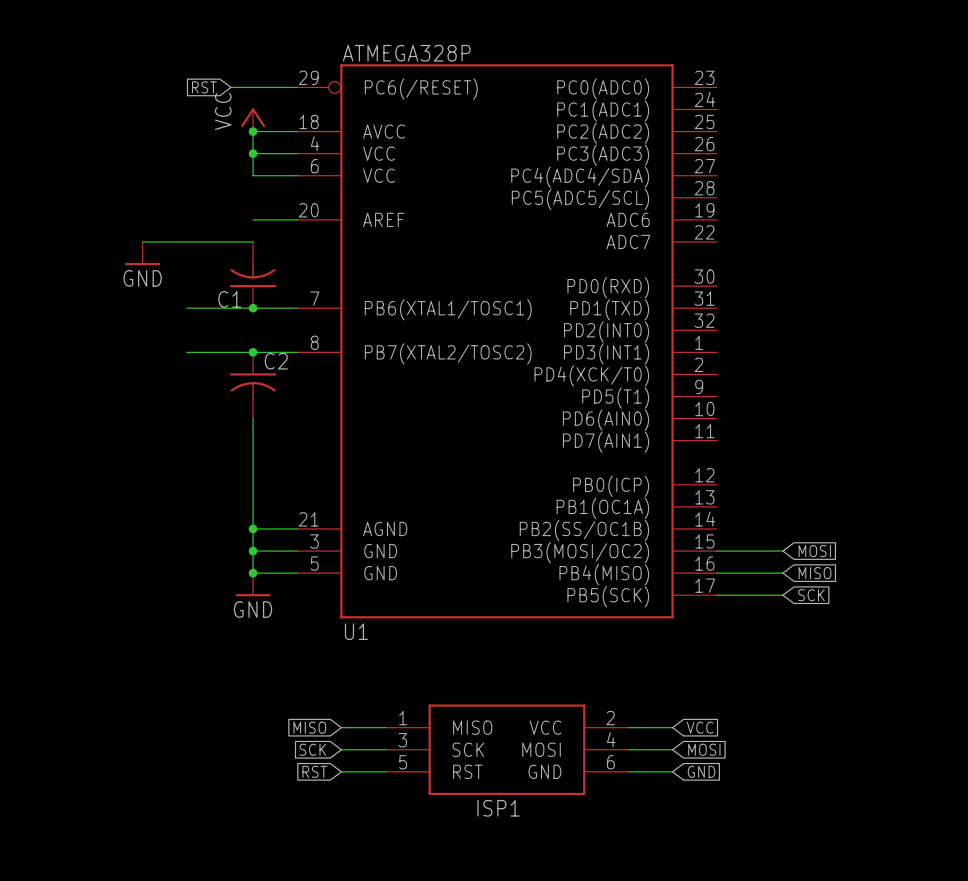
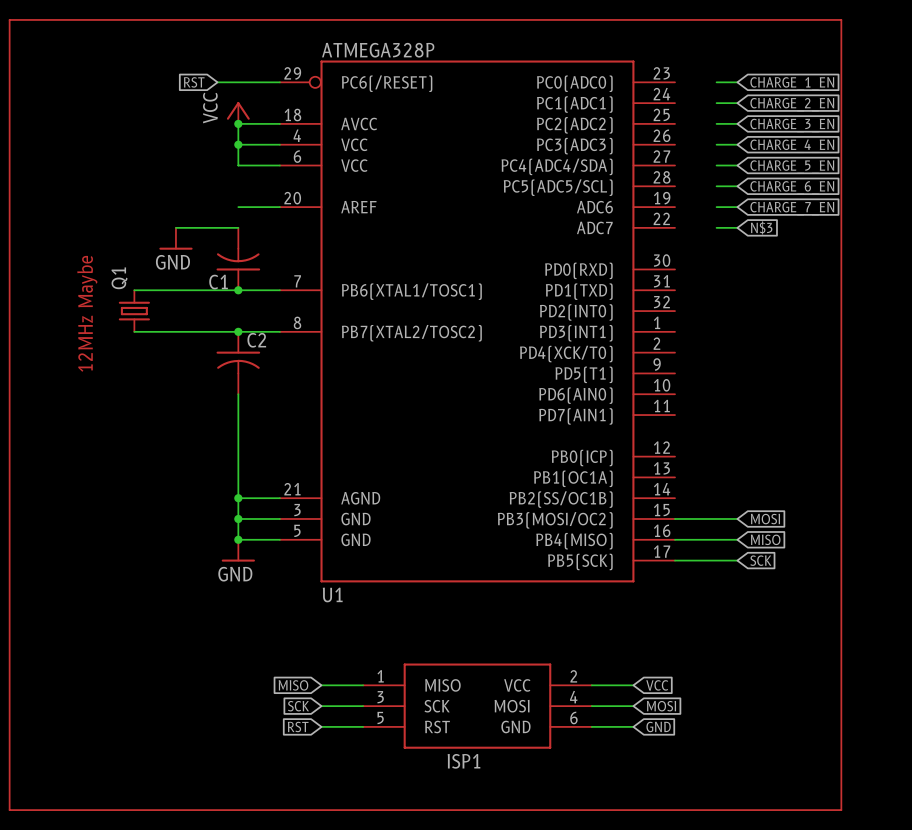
line: none -> (9, 19) (9, 810) (841, 810) (841, 19) (9, 19)
wire: none -> (716, 82) (737, 82)
global label: none -> CHARGE_1_EN (792, 83)
wire: none -> (716, 103) (737, 103)
global label: none -> CHARGE_2_EN (792, 104)
wire: none -> (716, 123) (737, 123)
global label: none -> CHARGE_3_EN (792, 125)
wire: none -> (716, 144) (737, 144)
global label: none -> CHARGE_4_EN (792, 146)
wire: none -> (716, 165) (737, 165)
global label: none -> CHARGE_5_EN (792, 167)
wire: none -> (716, 186) (737, 186)
global label: none -> CHARGE_6_EN (792, 187)
wire: none -> (716, 207) (737, 207)
global label: none -> CHARGE_7_EN (792, 208)
wire: (142, 241) (186, 241) -> (134, 290) (175, 290)
wire: none -> (716, 227) (737, 227)
global label: none -> N$3 (761, 227)
power symbol position: GND (142, 253) -> GND (175, 238)
text: none -> 12MHz Maybe (87, 313)
Q1: none -> (134, 311)
wire: none -> (134, 331) (175, 331)

